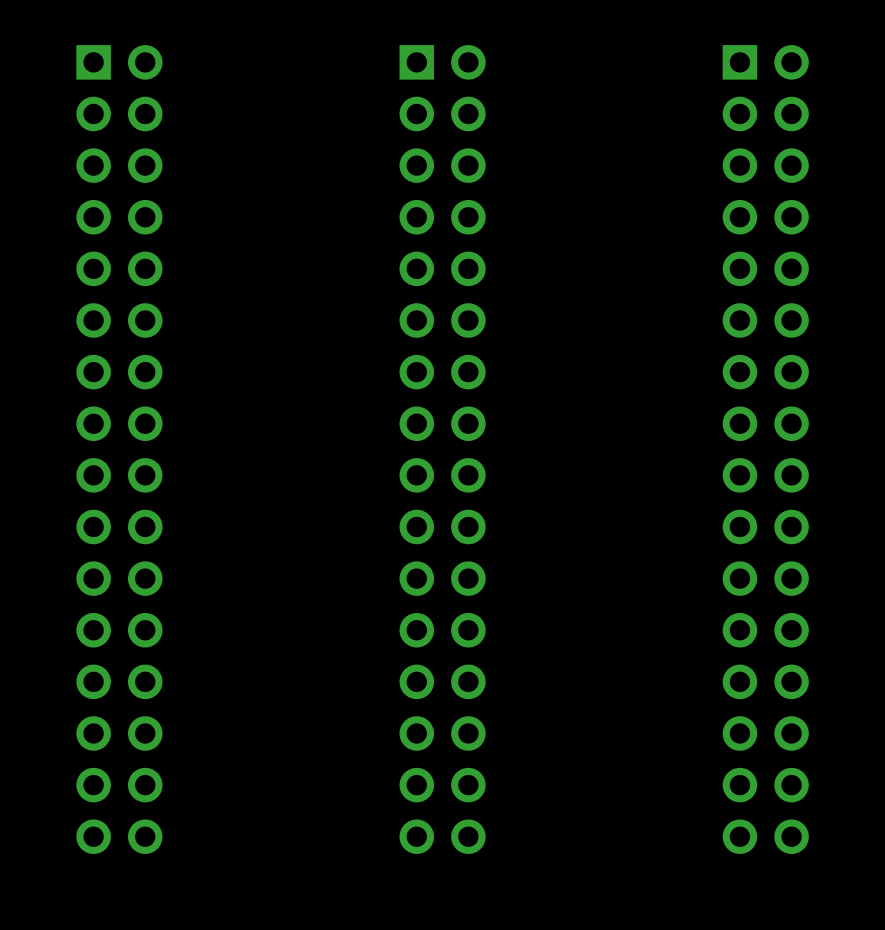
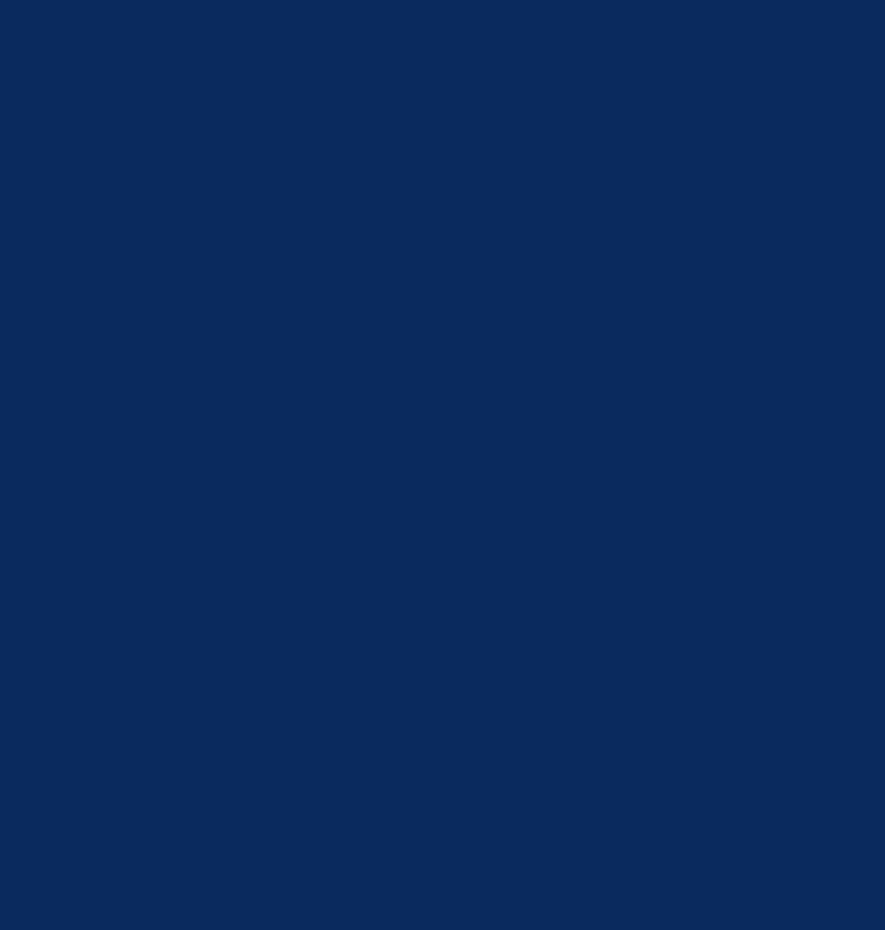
part: (119, 449) -> none
part: (442, 449) -> none
part: (765, 449) -> none

